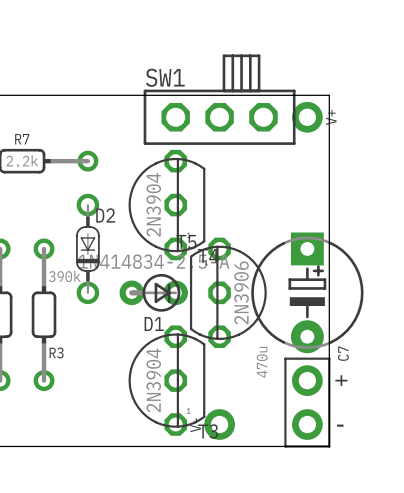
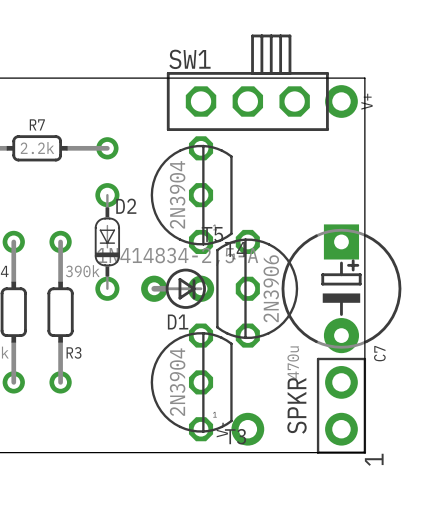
SPKR text: + (341, 380) -> none
SPKR name: none -> SPKR (296, 405)
SPKR text: - (340, 425) -> none
SPKR text: none -> 1 (374, 459)

